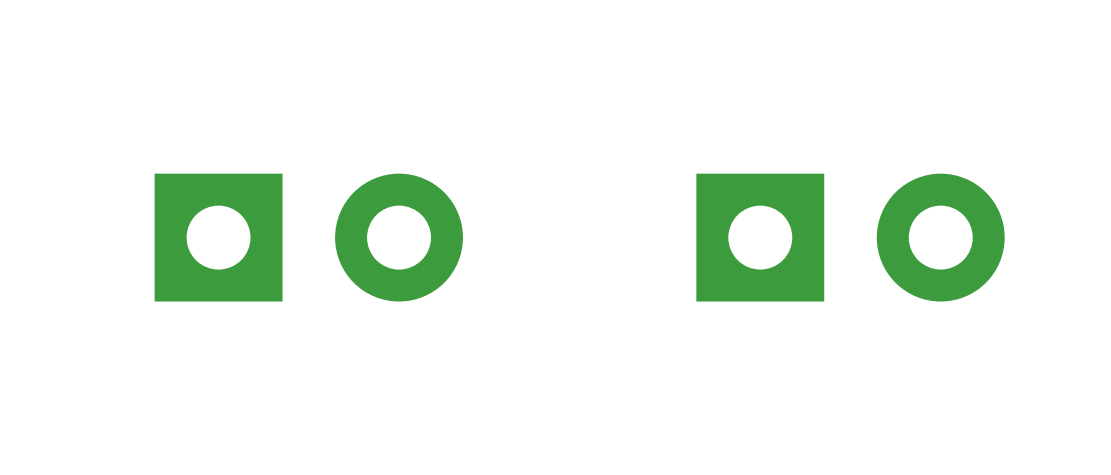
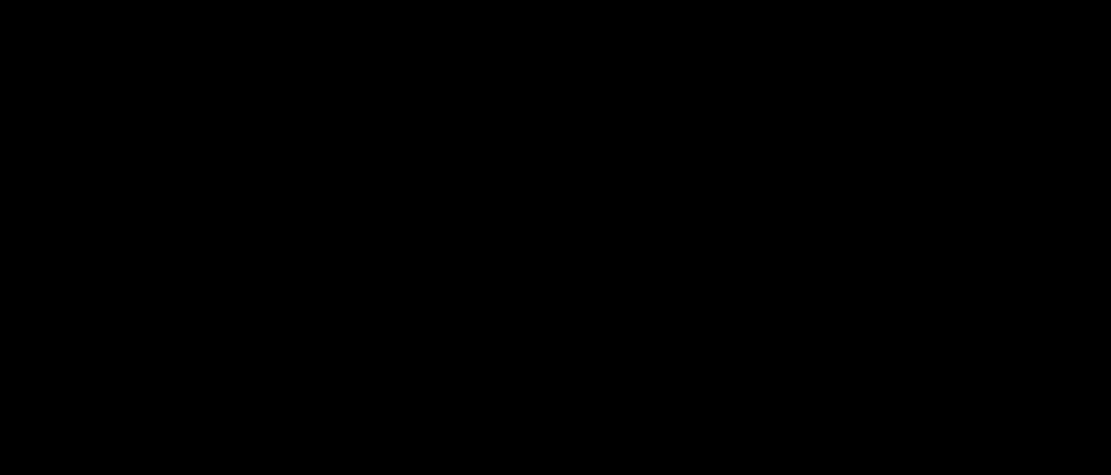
part: (308, 237) -> none
part: (850, 237) -> none

